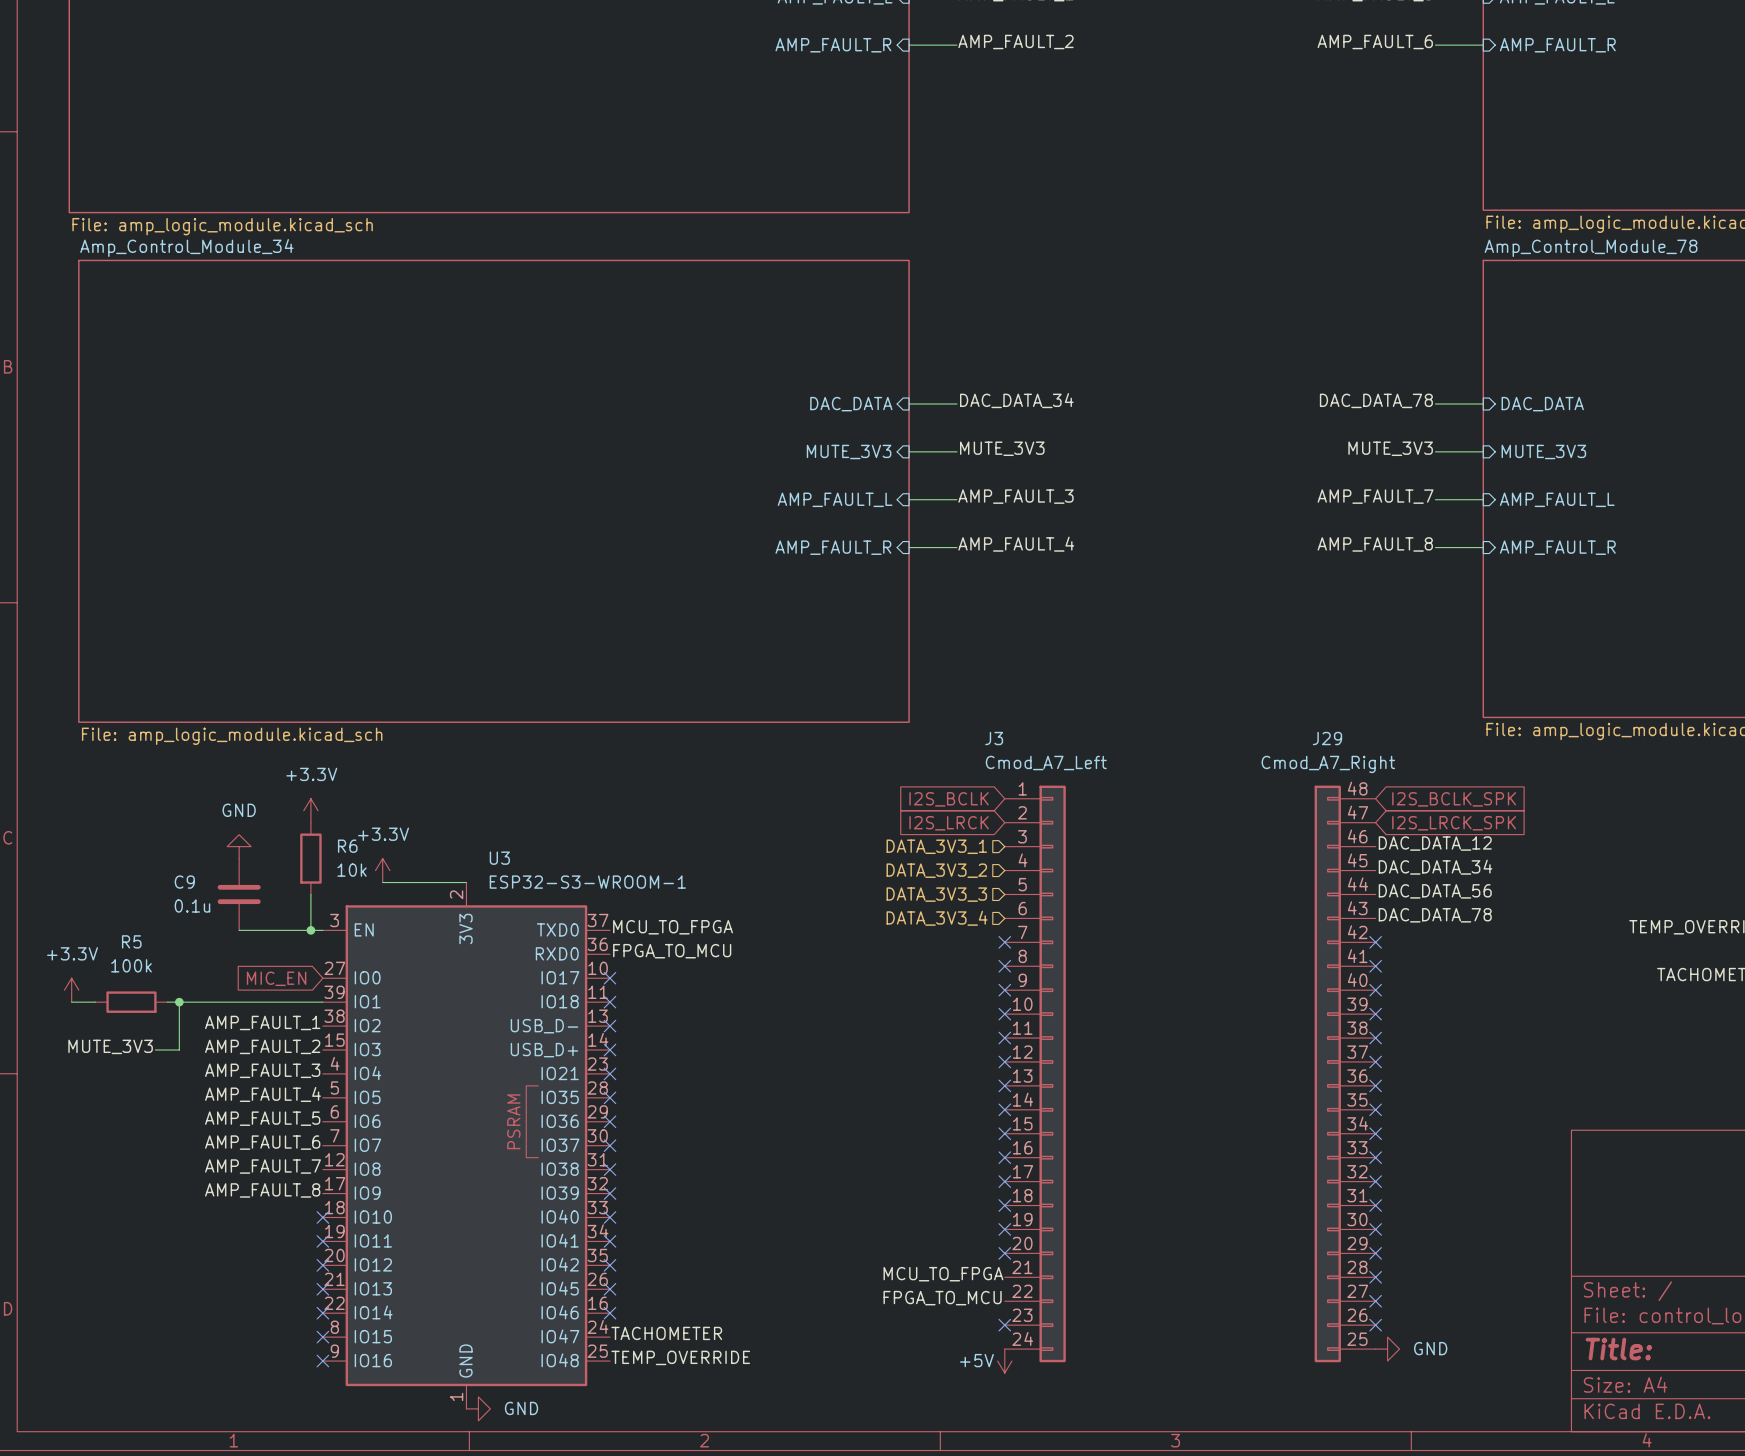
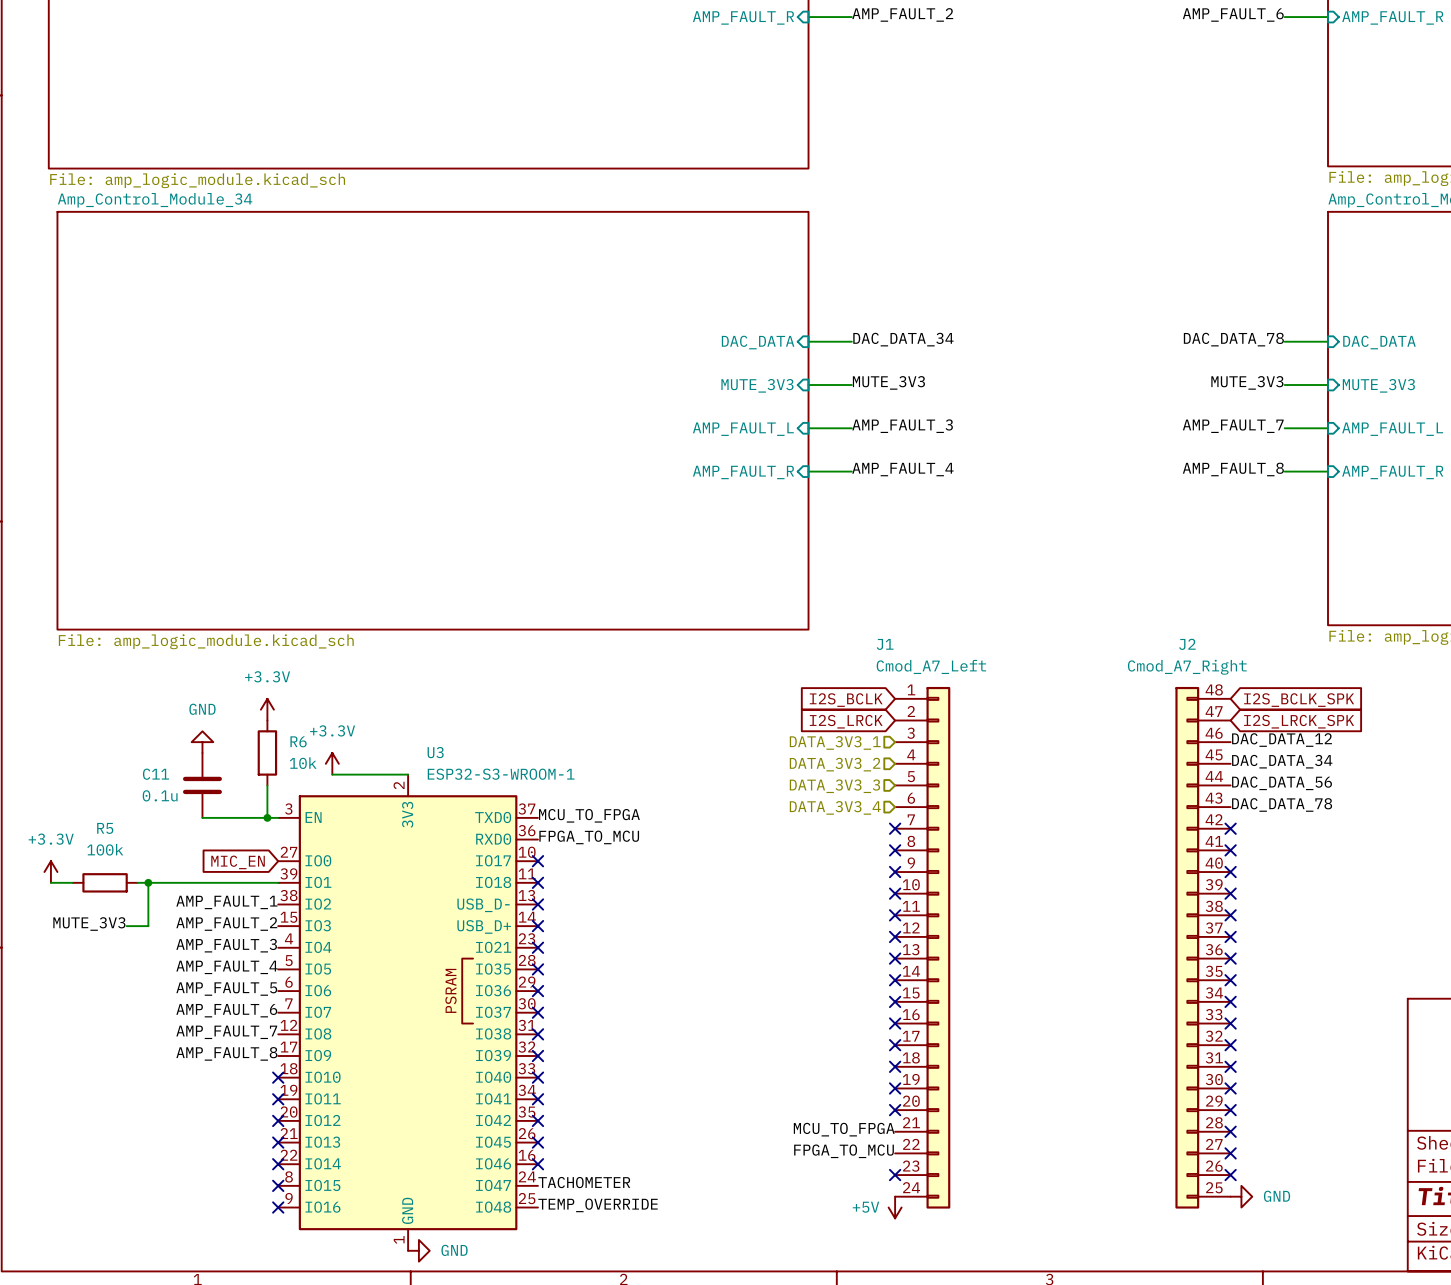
J3 name: J3 (994, 738) -> J1 (885, 644)
J29 name: J29 (1327, 738) -> J2 (1187, 644)
C9 name: C9 (184, 882) -> C11 (155, 774)

